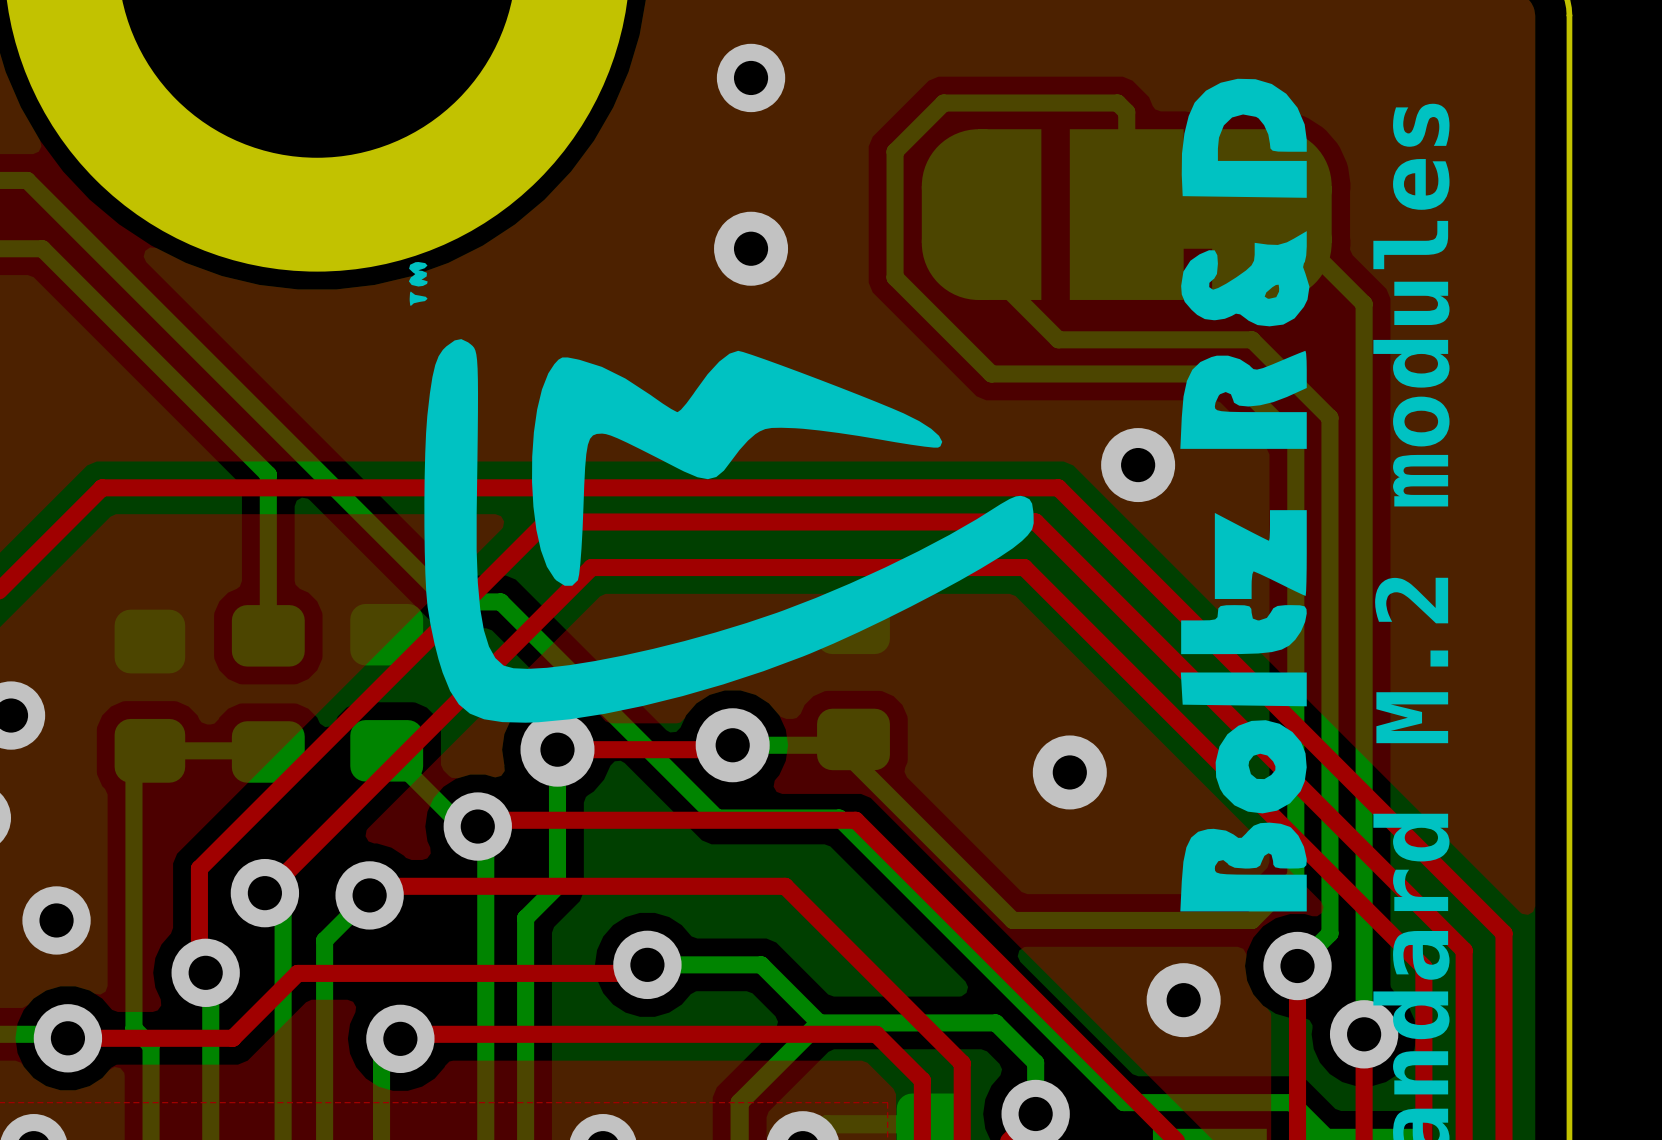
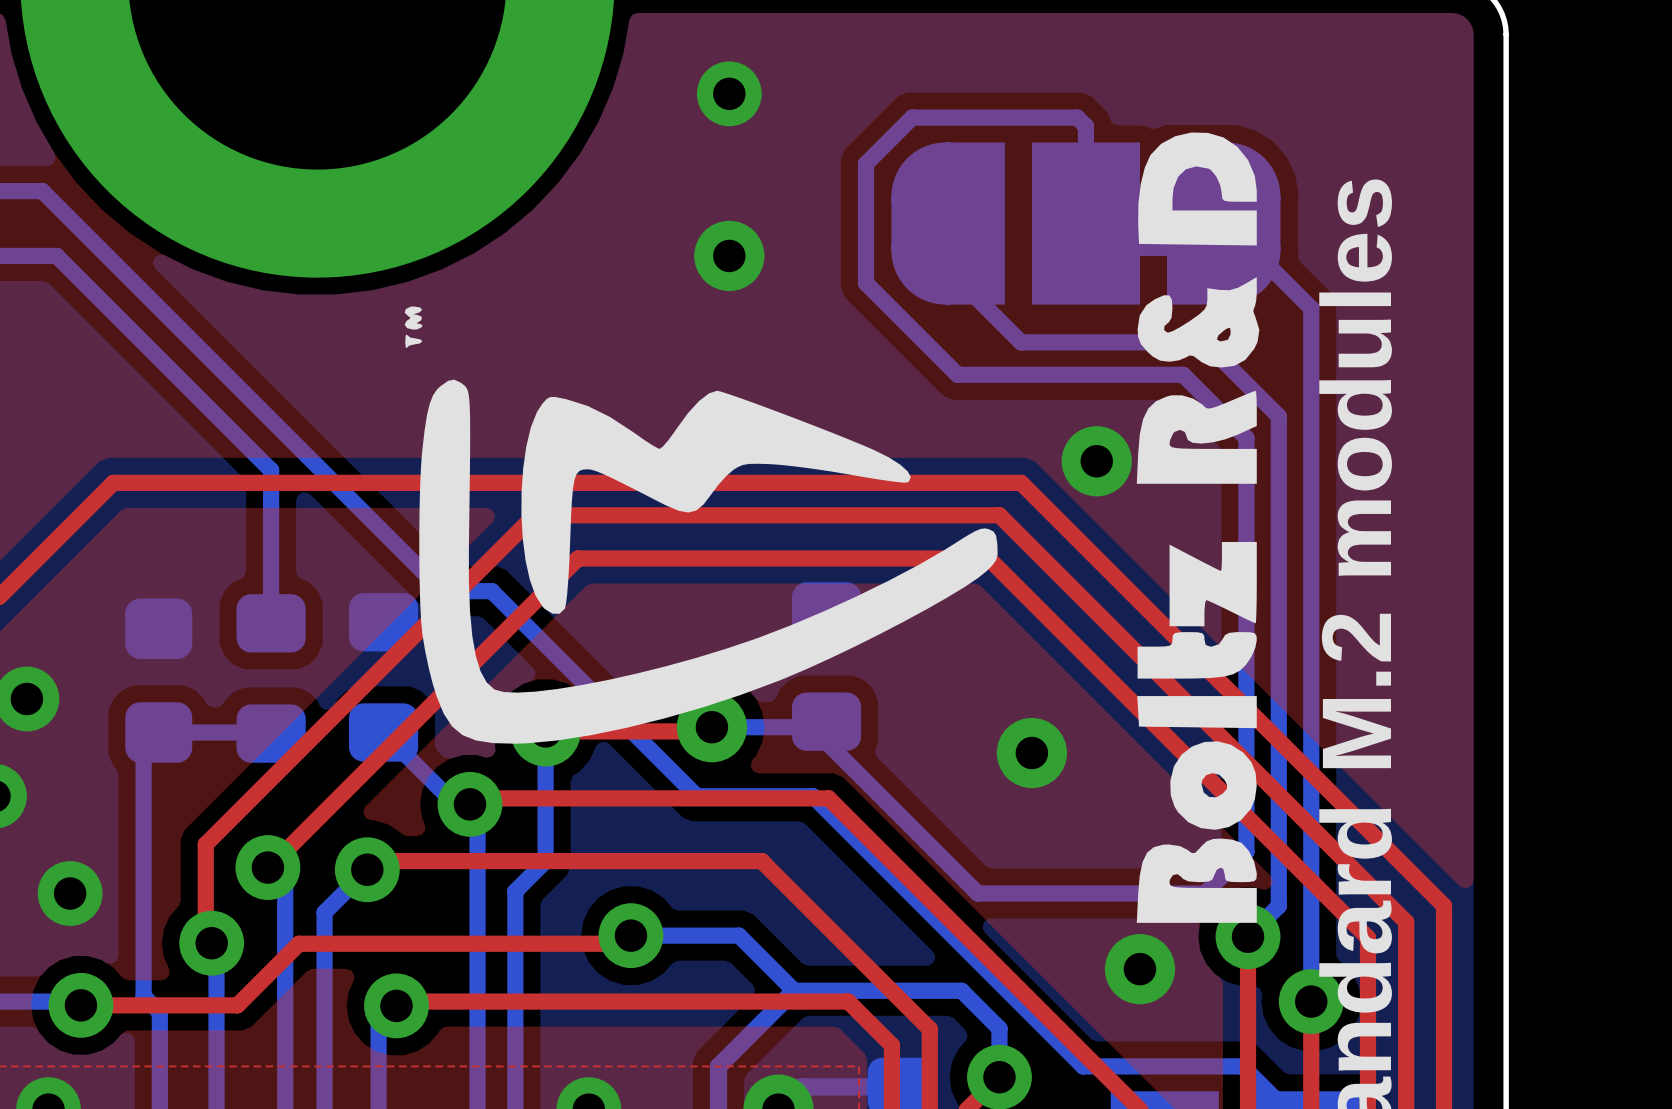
drawing position: (859, 495) -> (831, 527)

